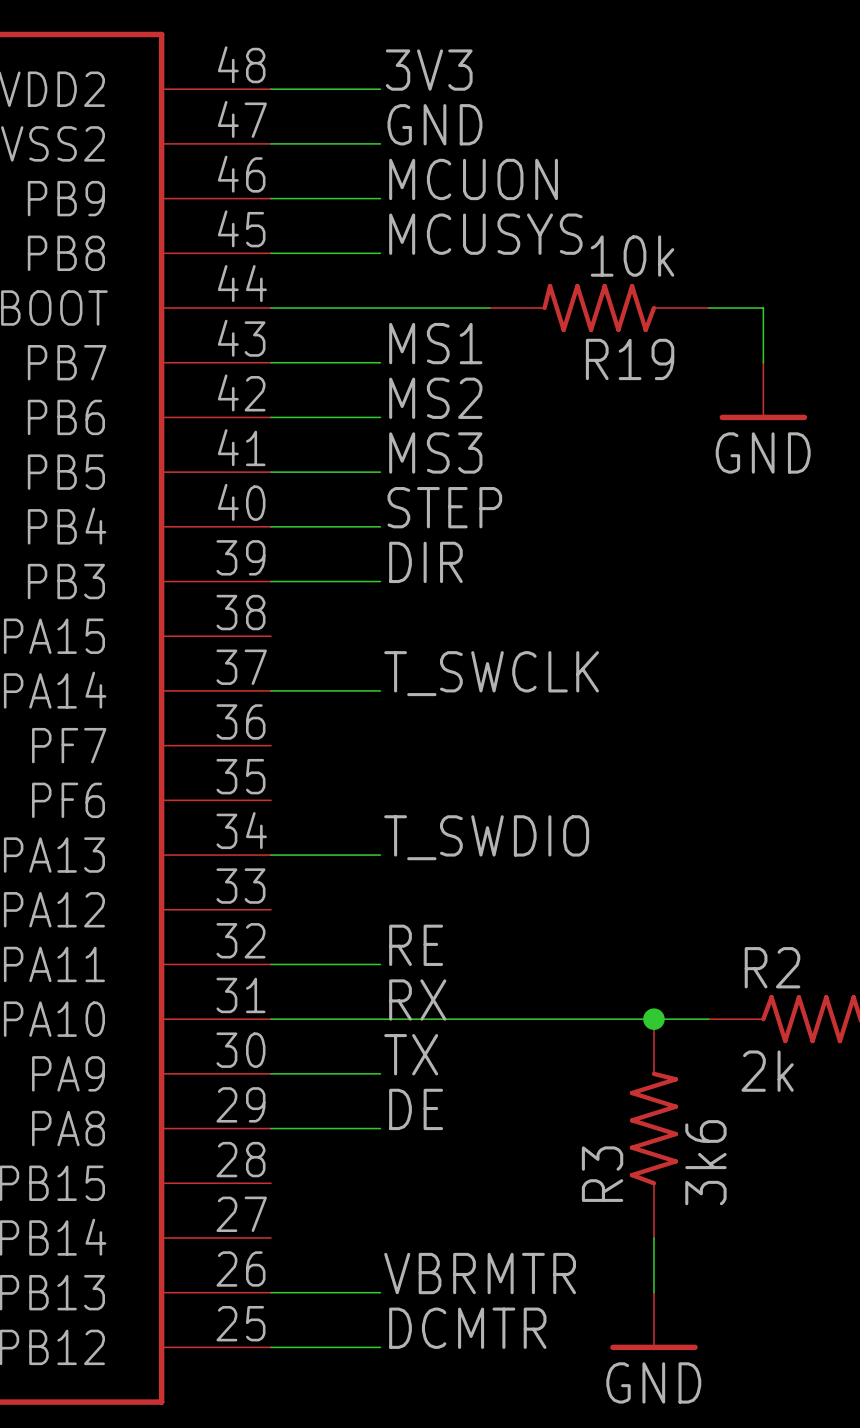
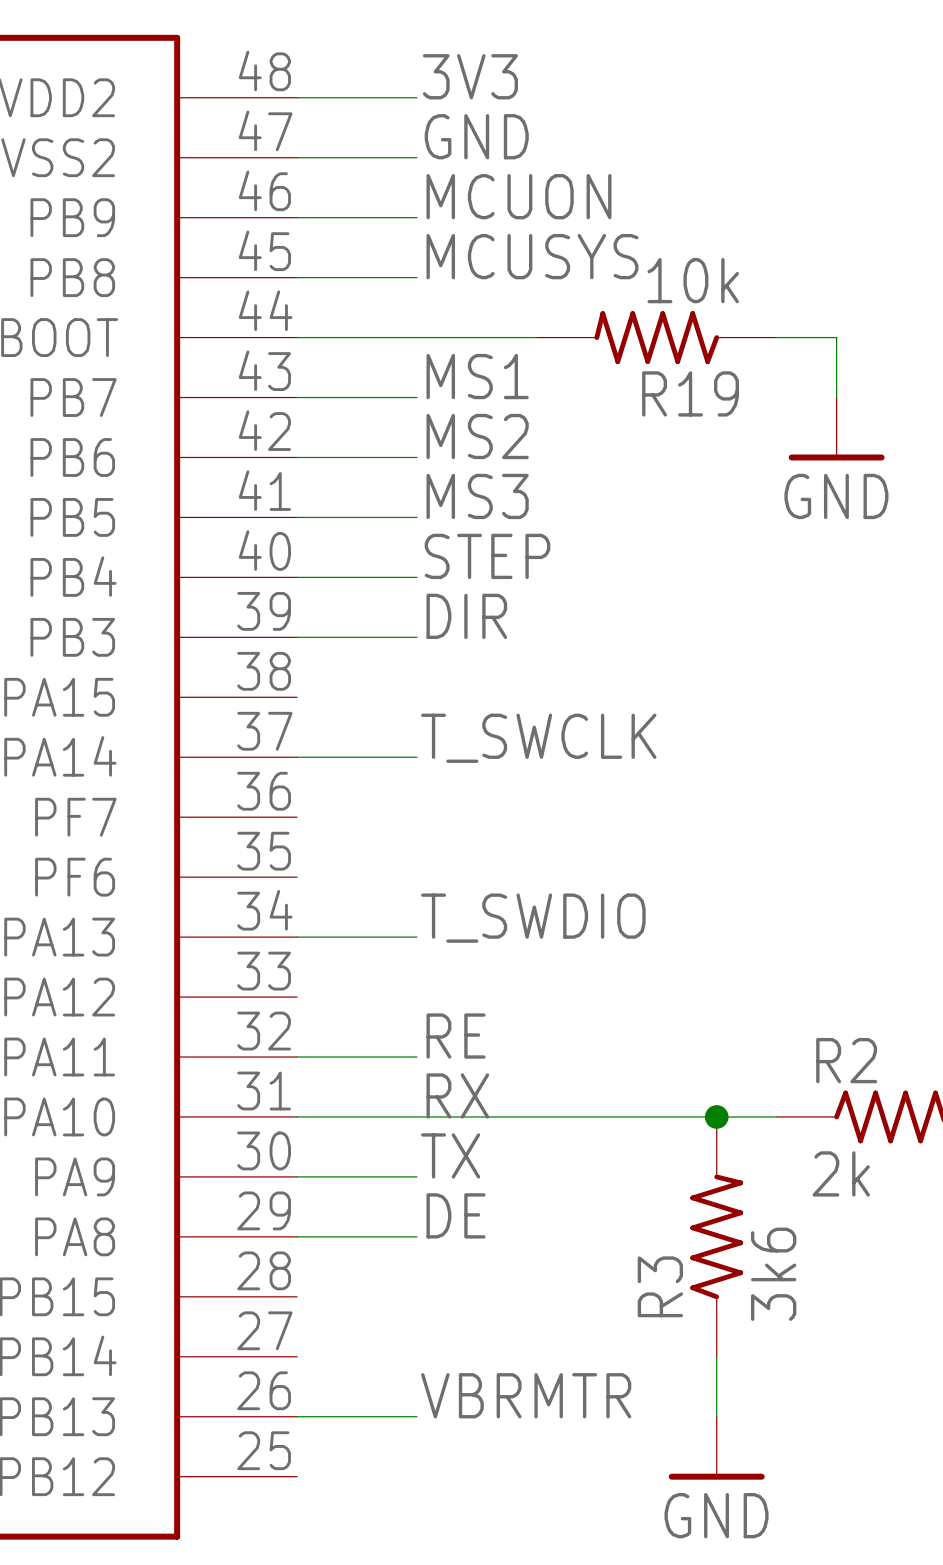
label: DCMTR (467, 1328) -> none
wire: (271, 1347) (380, 1347) -> none

